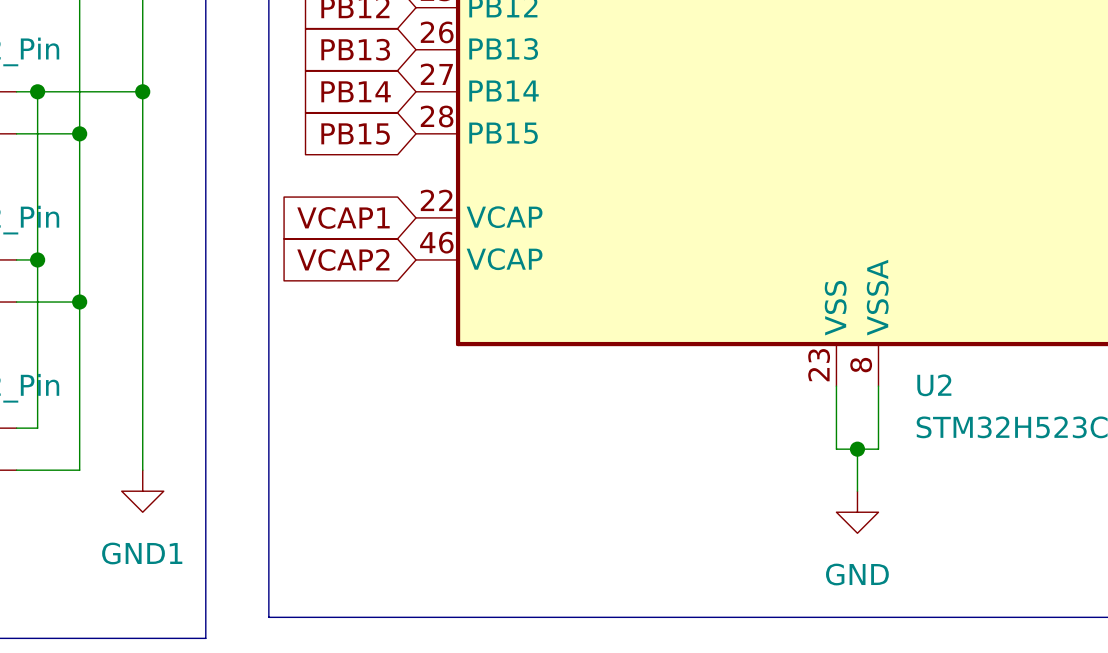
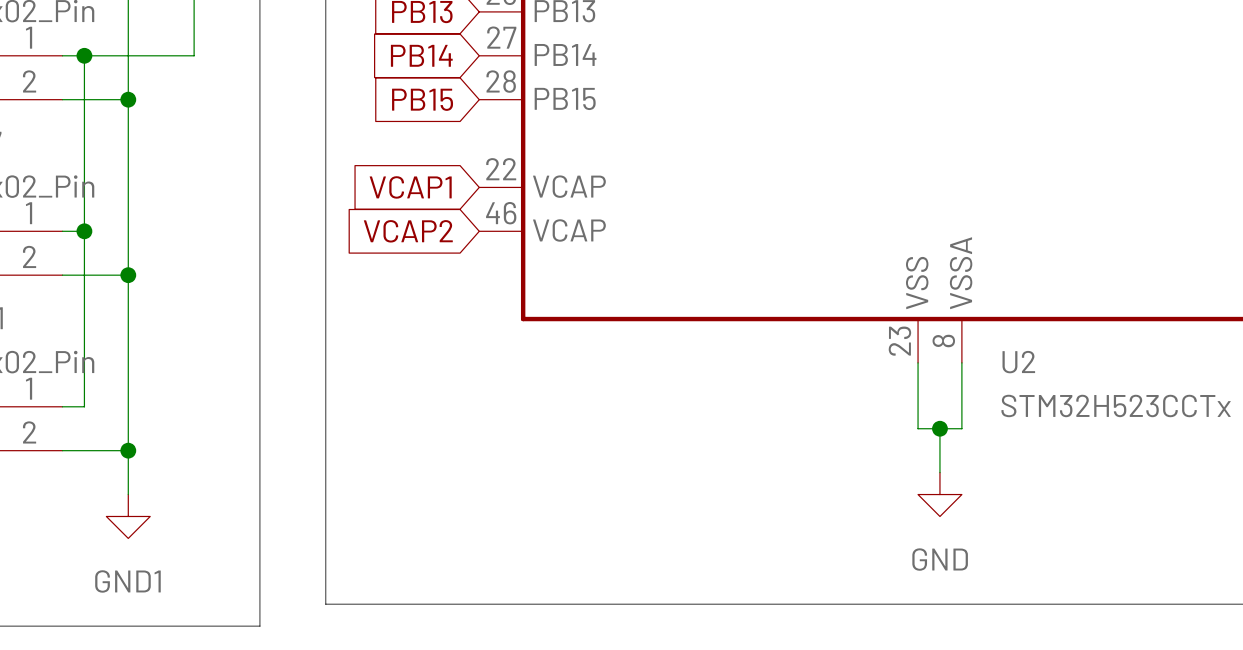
wire: (142, 91) (142, 470) -> none
junction: (142, 91) -> none
wire: none -> (128, 450) (128, 494)
junction: none -> (128, 450)
power symbol position: GND1 (142, 491) -> GND1 (128, 516)

